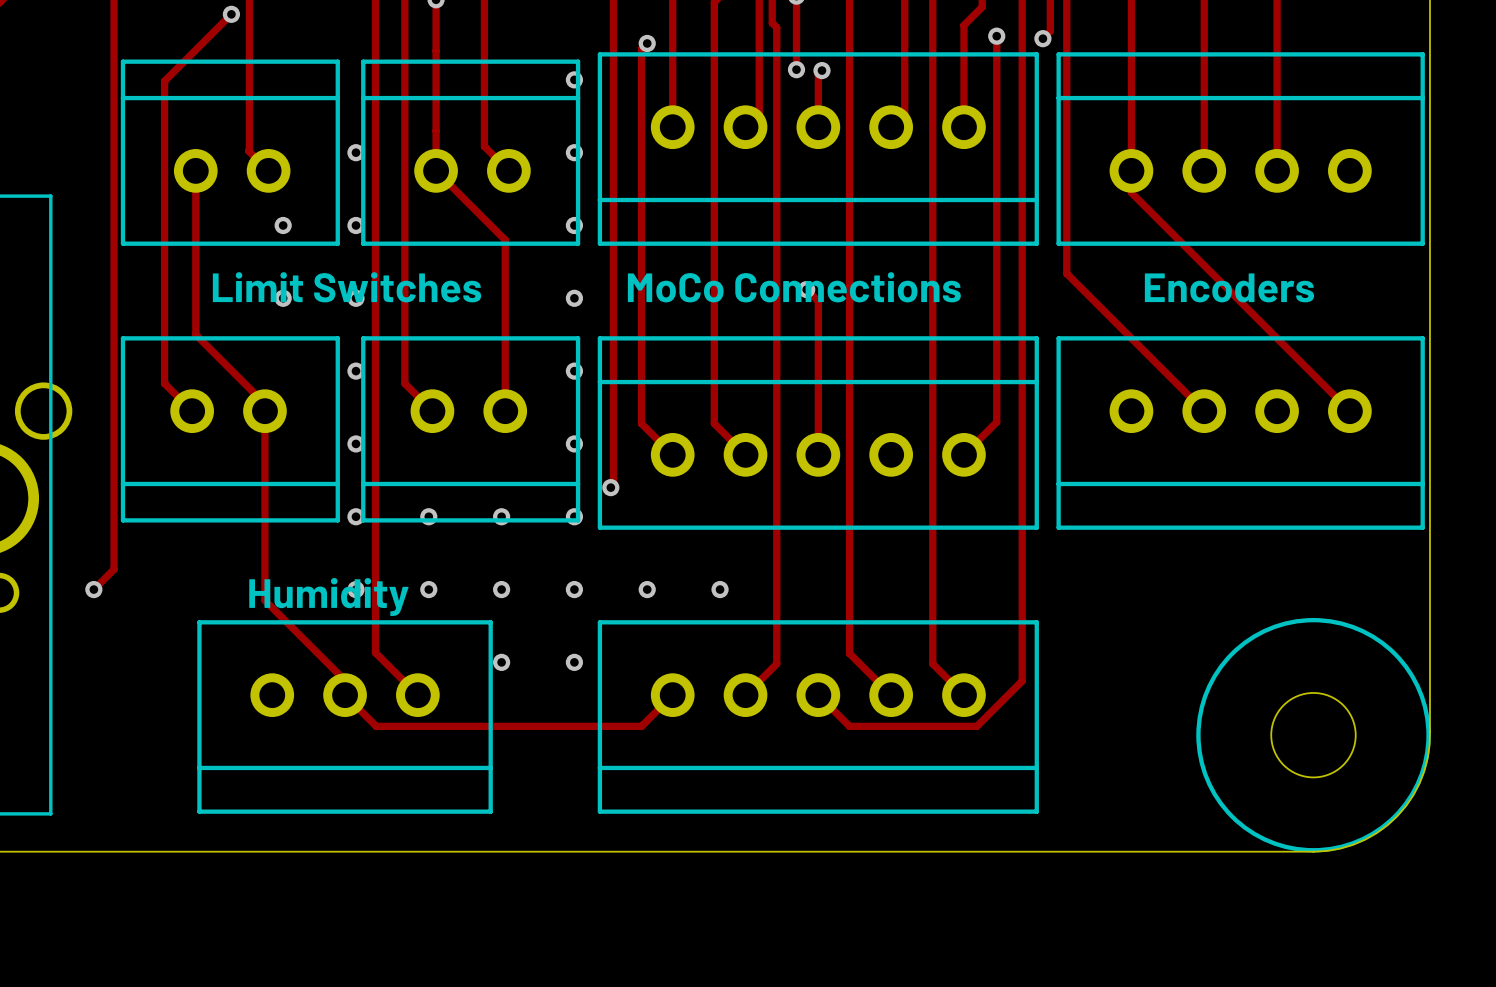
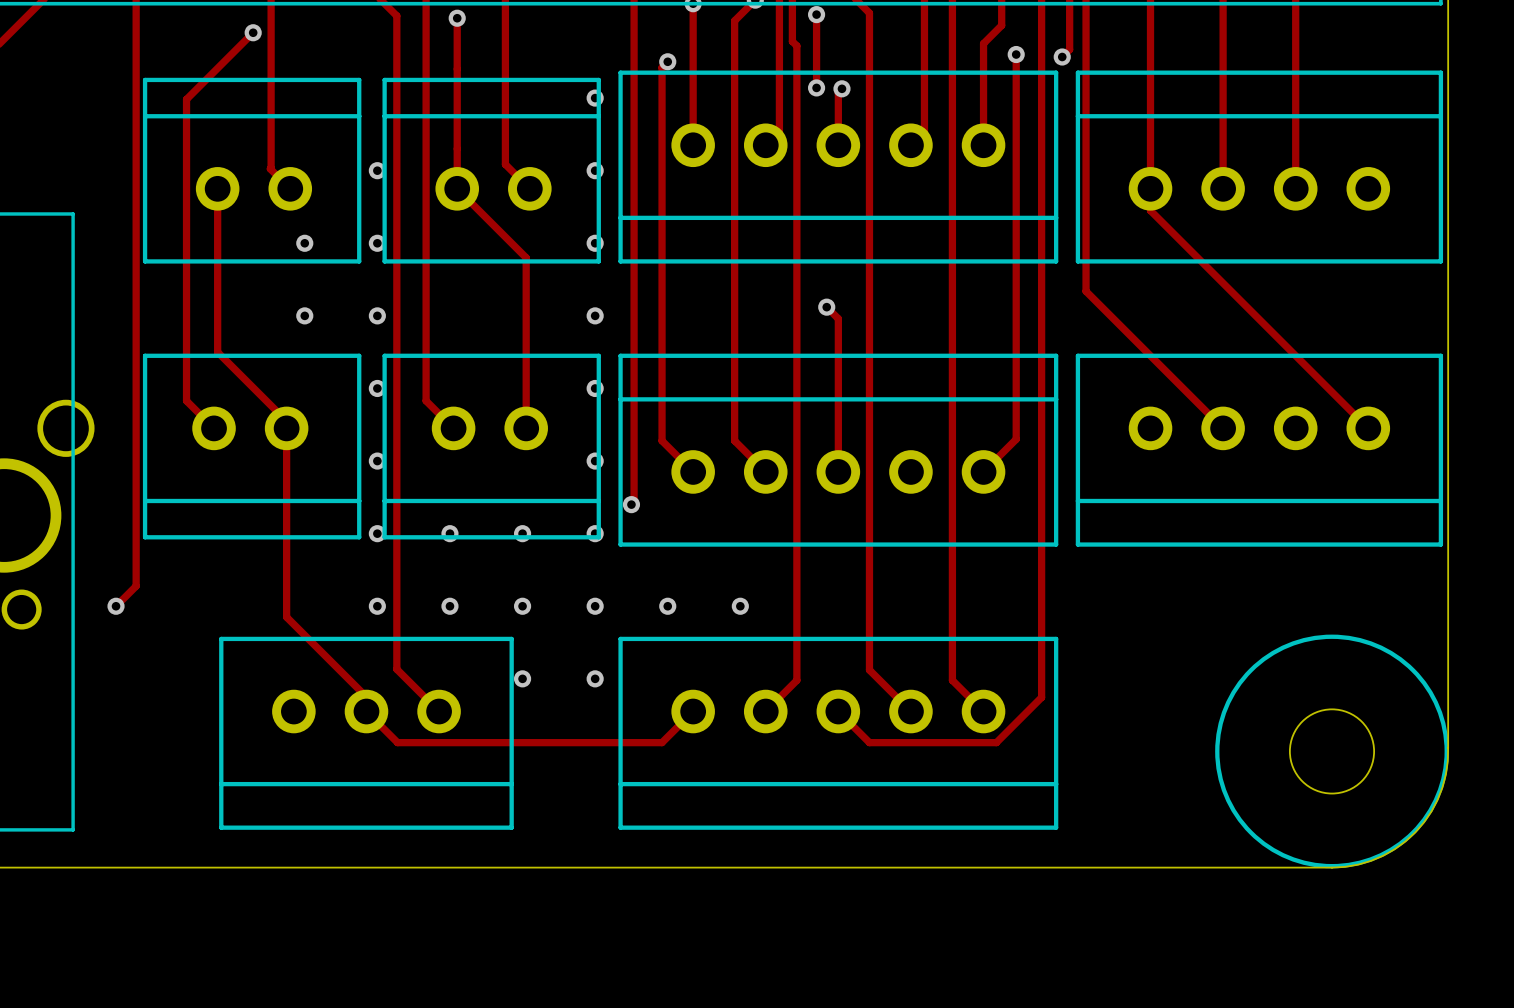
text: Limit Switches (347, 287) -> none
text: MoCo Connections (794, 287) -> none
text: Encoders (1229, 287) -> none
text: Humidity (328, 597) -> none

